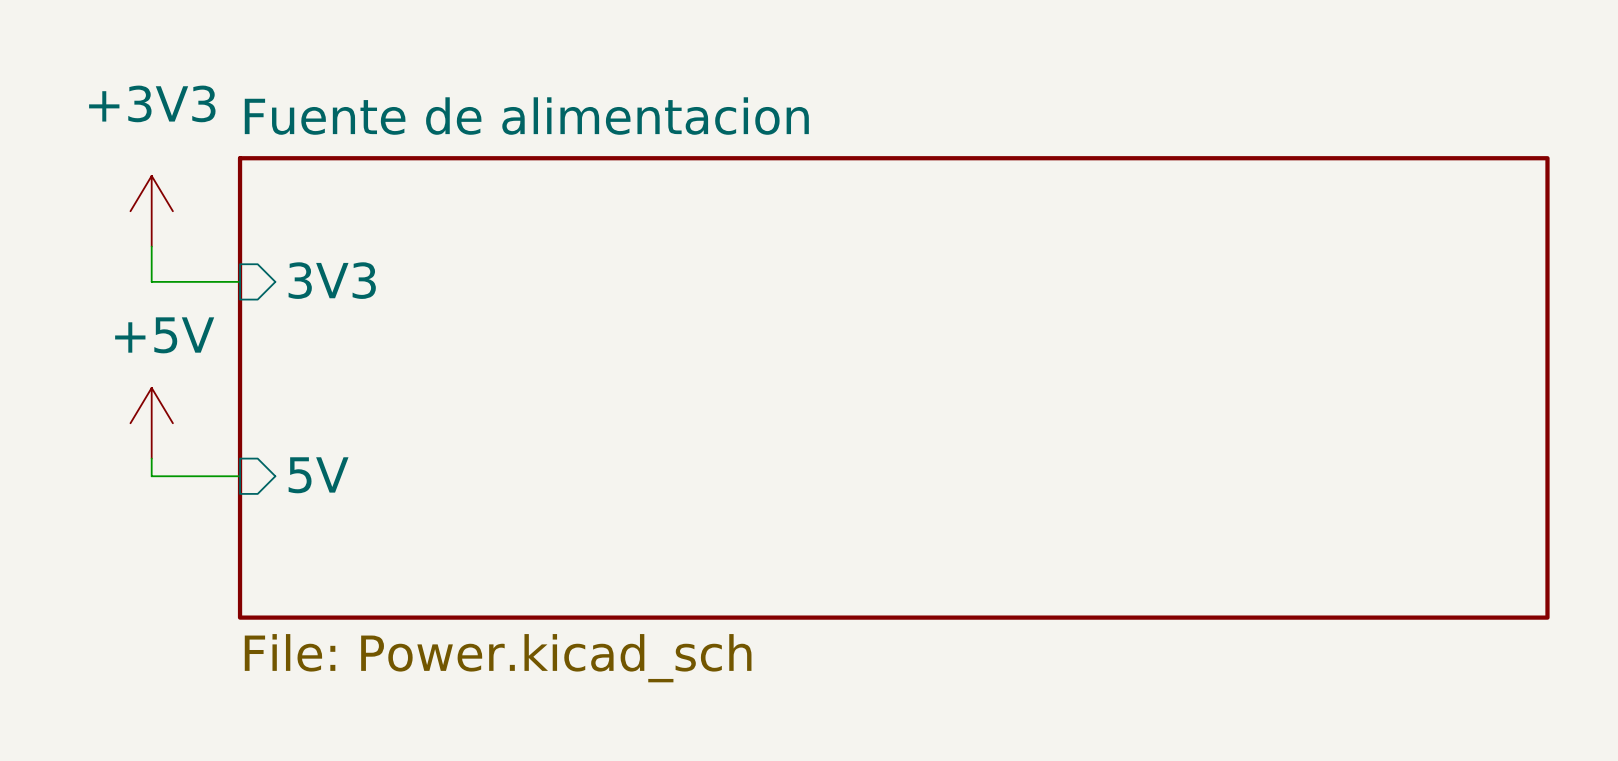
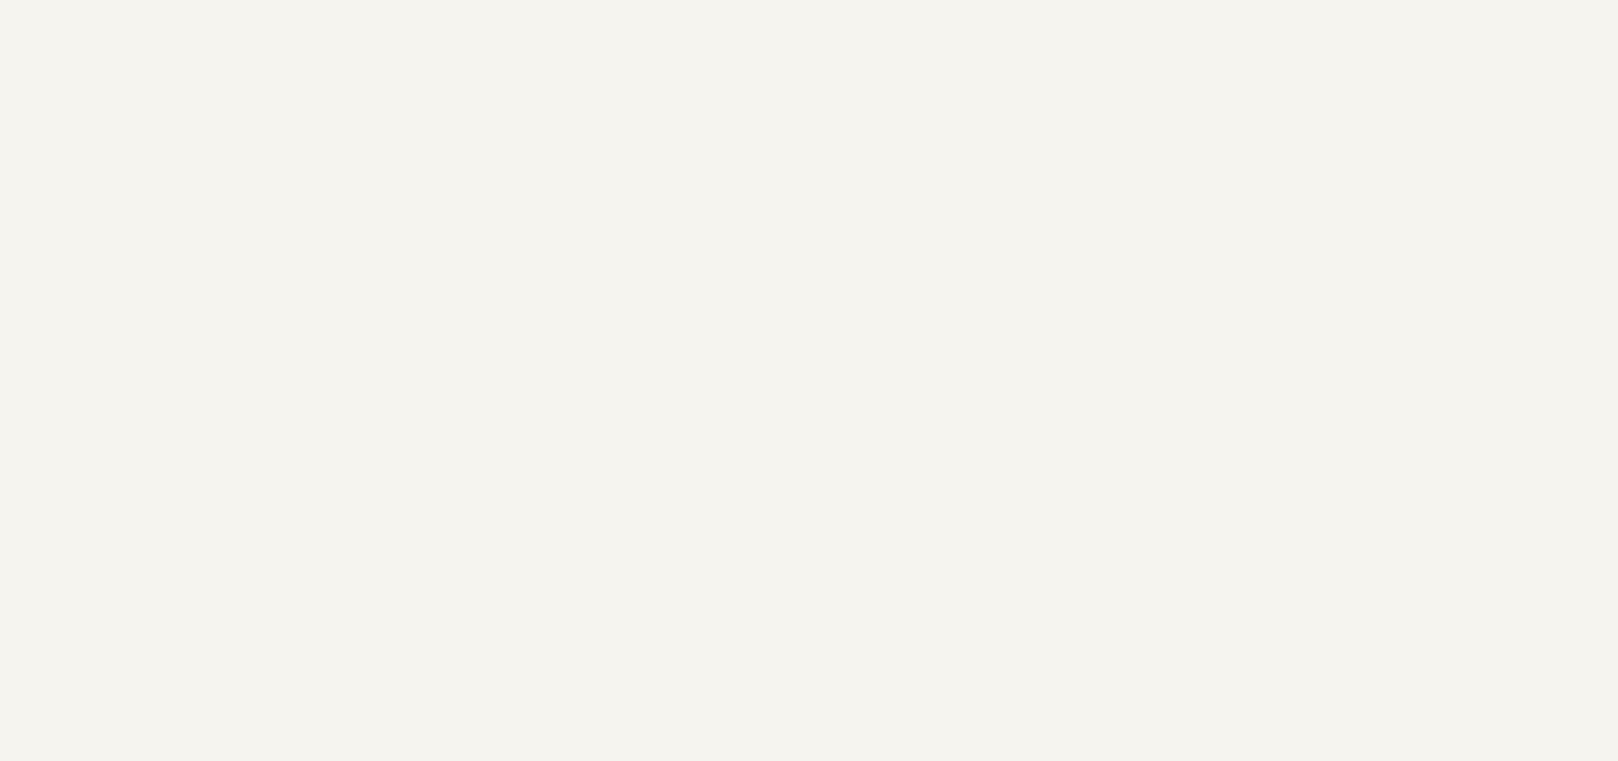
power symbol: +3V3 (151, 211) -> none
wire: (151, 246) (151, 281) (240, 281) -> none
sheet pin: 3V3 (332, 280) -> none
sheet Fuente de alimentacion: File: Power.kicad_sch (893, 387) -> none
power symbol: +5V (151, 423) -> none
wire: (151, 458) (151, 476) (240, 476) -> none
sheet pin: 5V (318, 475) -> none

